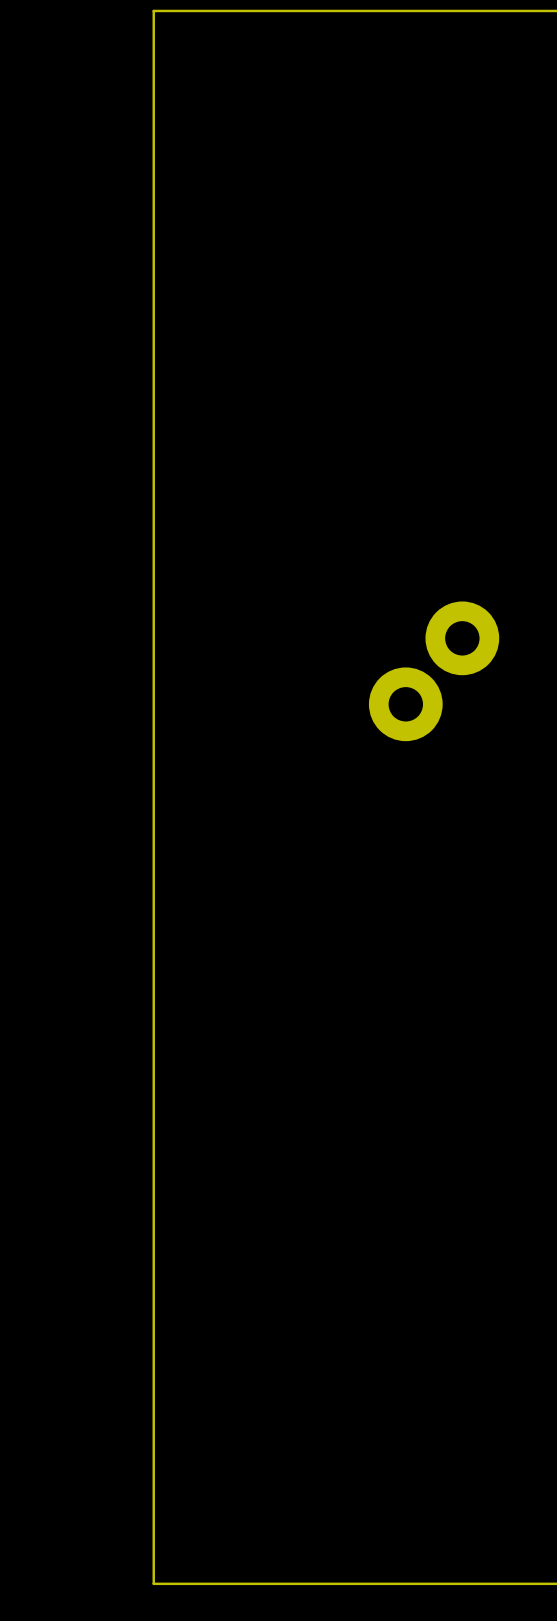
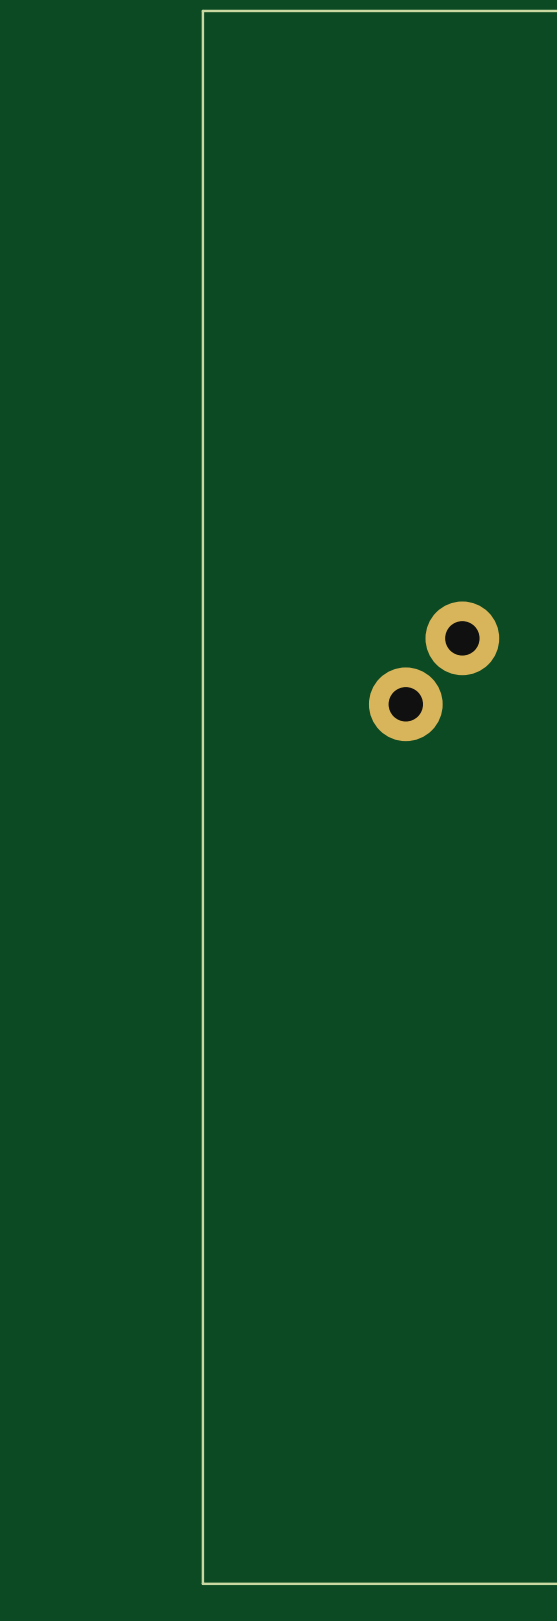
board edge: (202, 10) (153, 10) (153, 1583) (202, 1583) -> (202, 10) (202, 1583)

